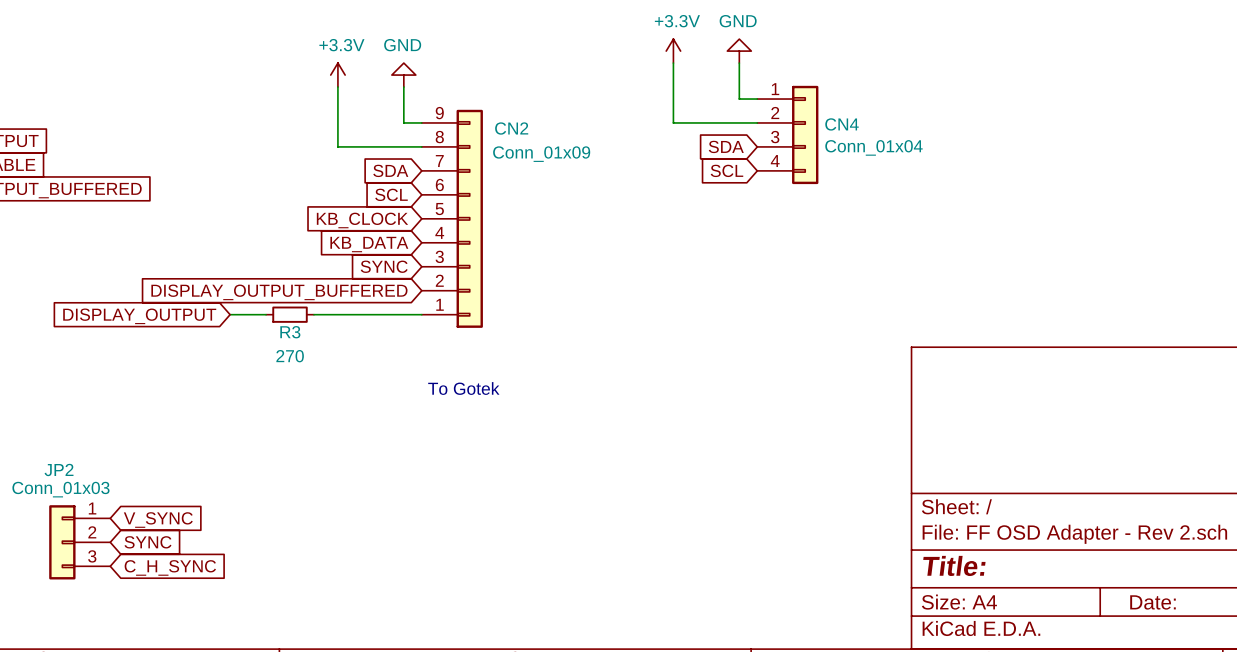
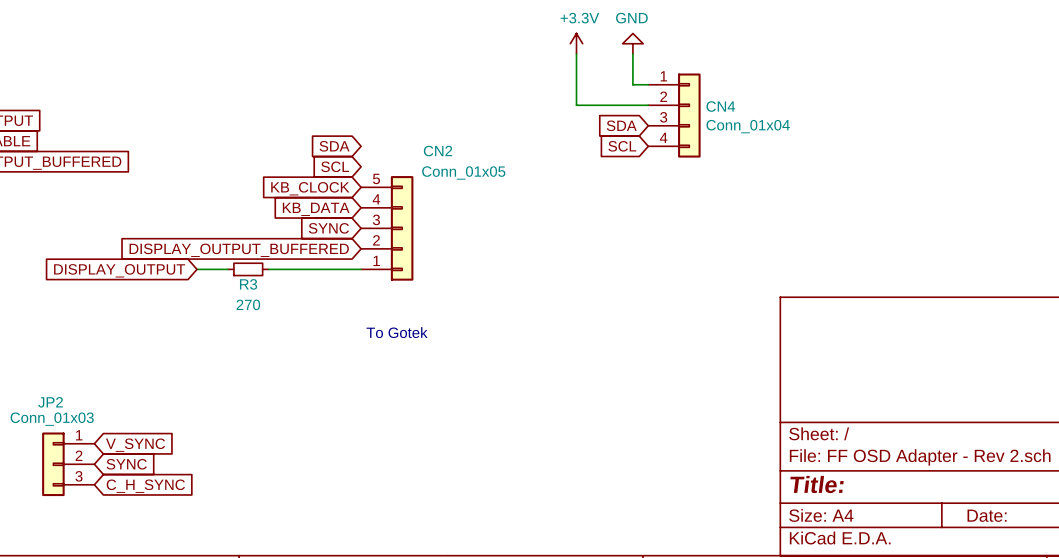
power symbol: +3.3V (337, 75) -> none
power symbol: GND (403, 75) -> none
wire: (337, 87) (337, 146) (421, 146) -> none
wire: (403, 87) (403, 122) (421, 122) -> none
CN2 symbol: [421, 109, 483, 328] -> [361, 176, 414, 281]
CN2 value: Conn_01x09 (541, 154) -> Conn_01x05 (463, 172)

